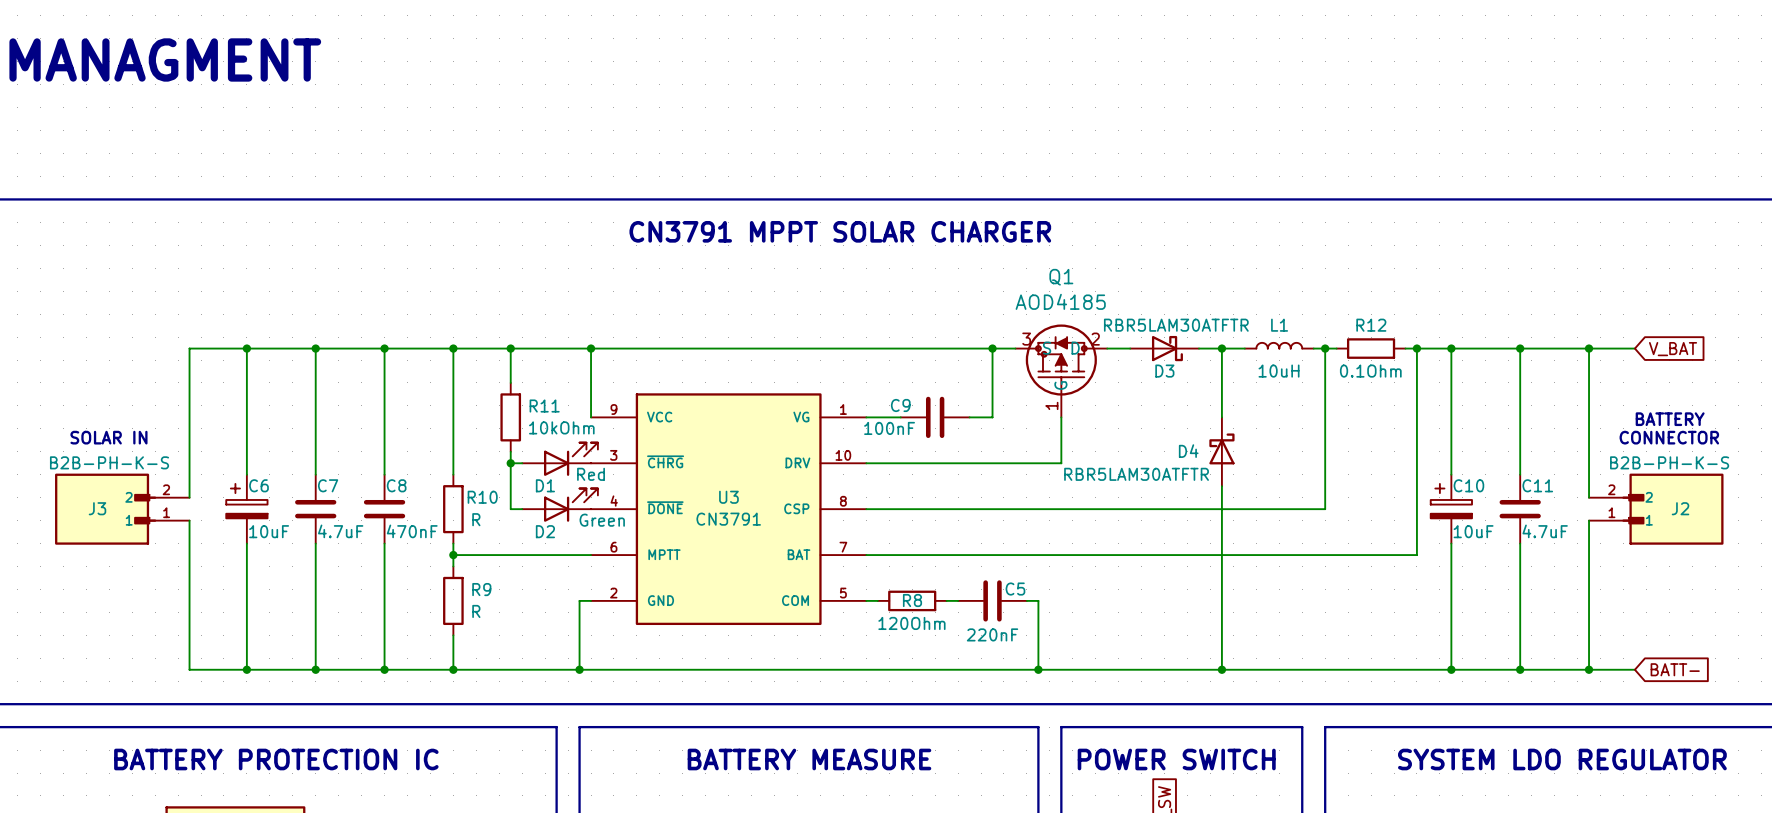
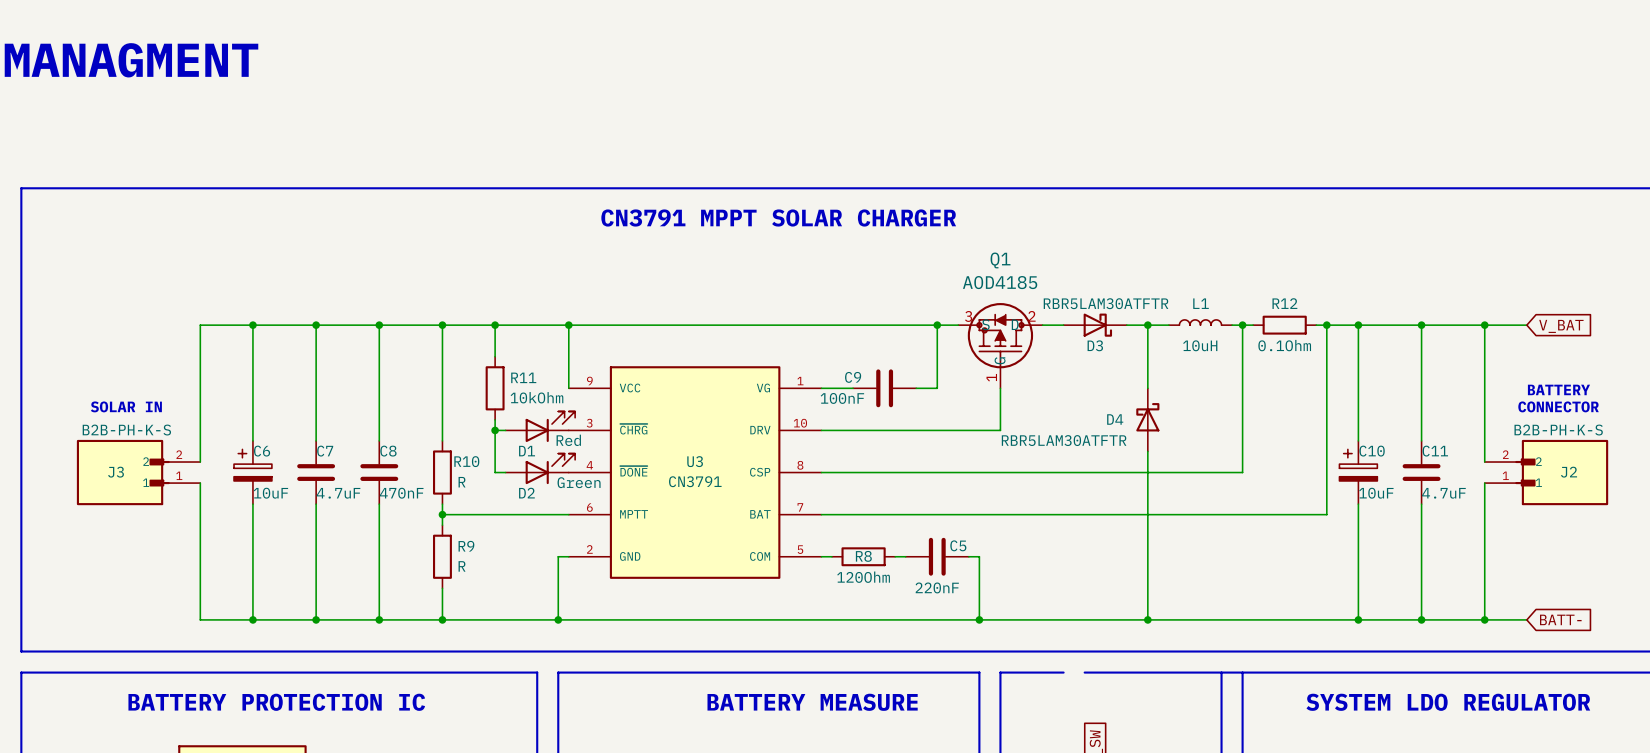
line: (1130, 727) (1153, 727) -> (1221, 672) (1242, 672)
text position: BATTERY MEASURE (809, 759) -> BATTERY MEASURE (812, 702)
text: POWER SWITCH (1176, 759) -> none

